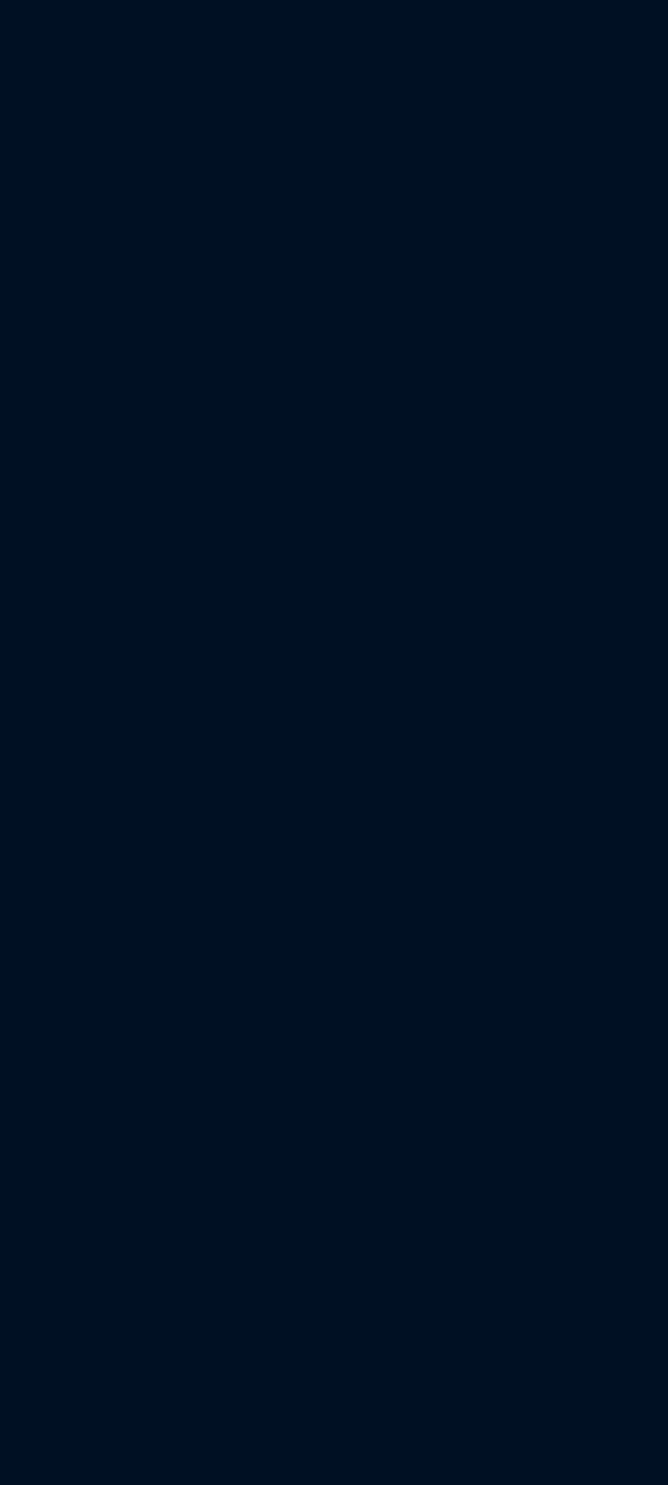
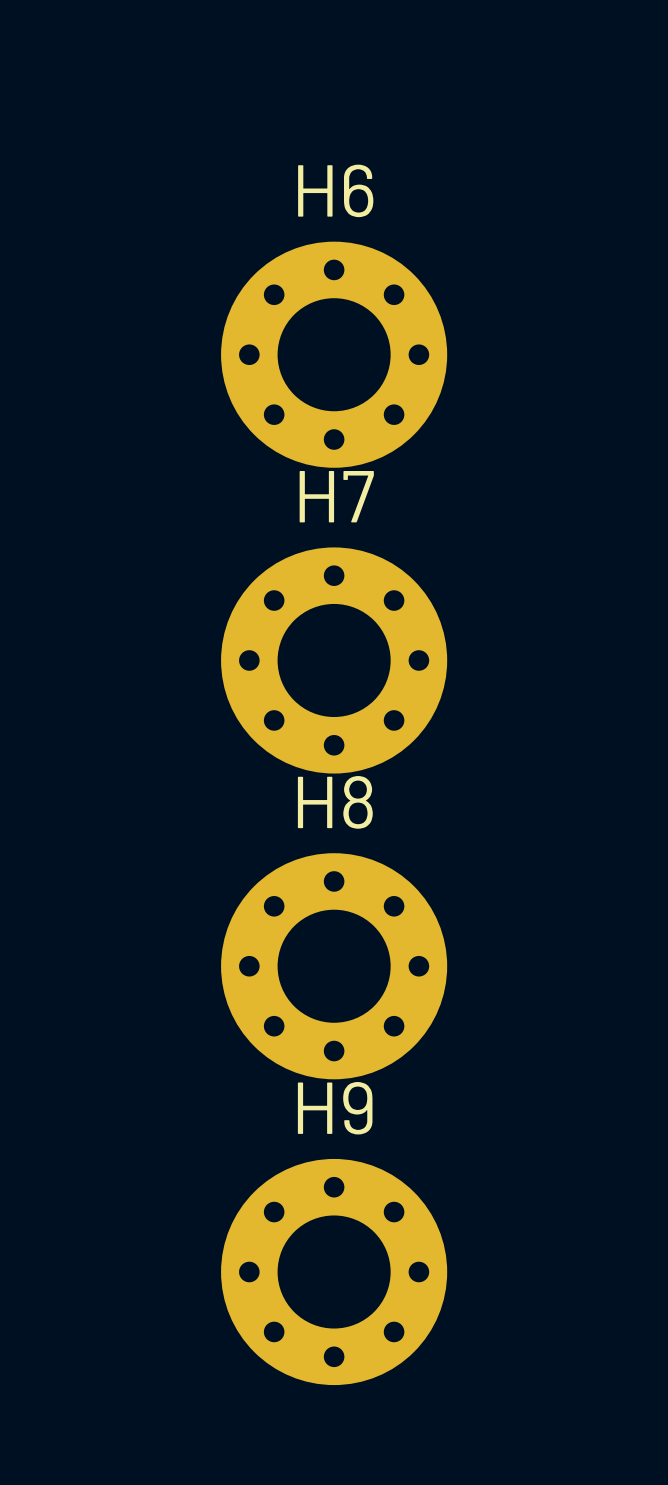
H6: none -> (334, 354)
H7: none -> (334, 660)
H8: none -> (334, 966)
H9: none -> (334, 1272)

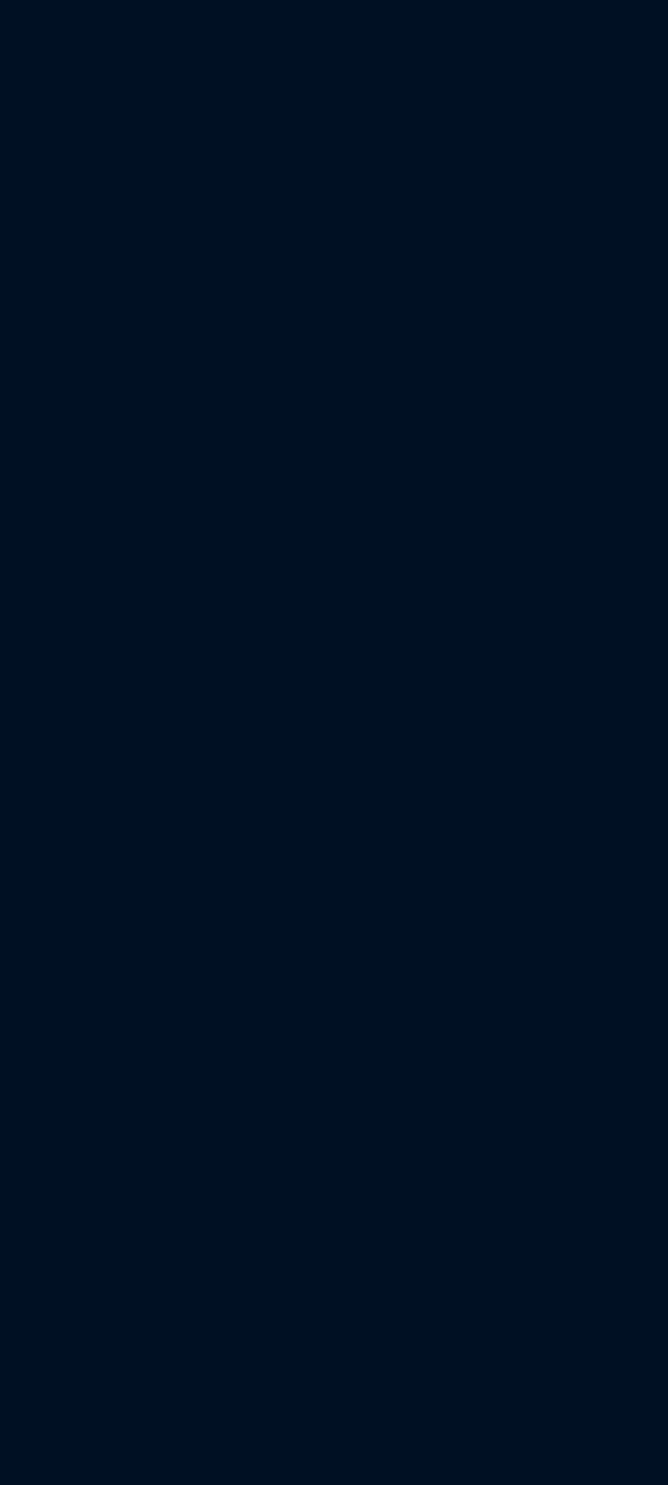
H6: (334, 354) -> none
H7: (334, 660) -> none
H8: (334, 966) -> none
H9: (334, 1272) -> none

